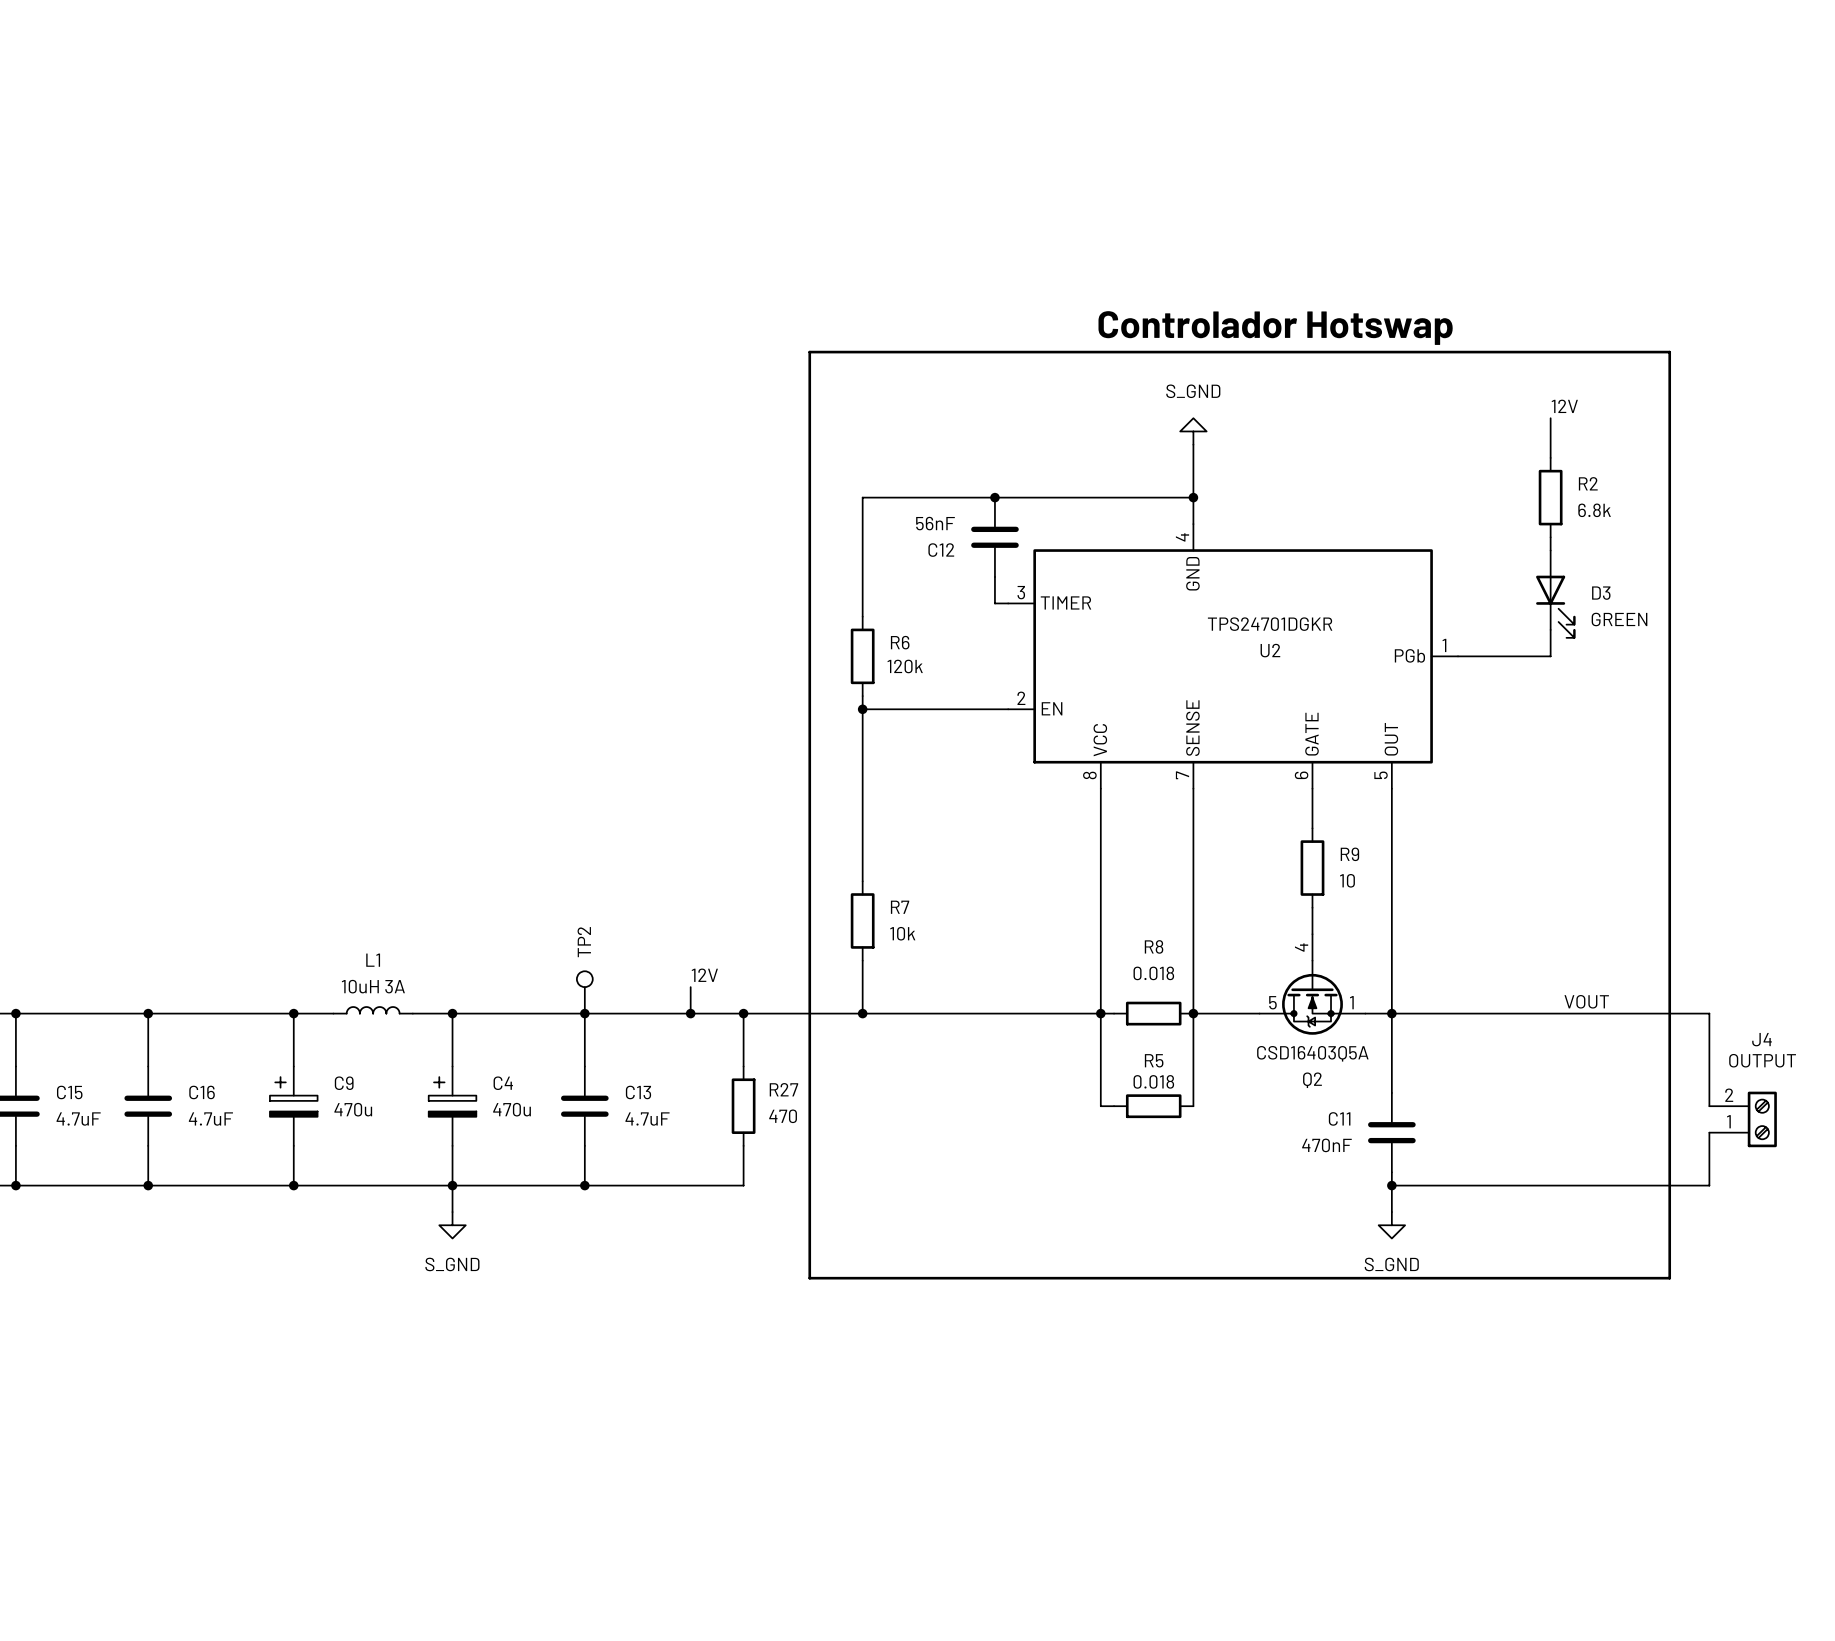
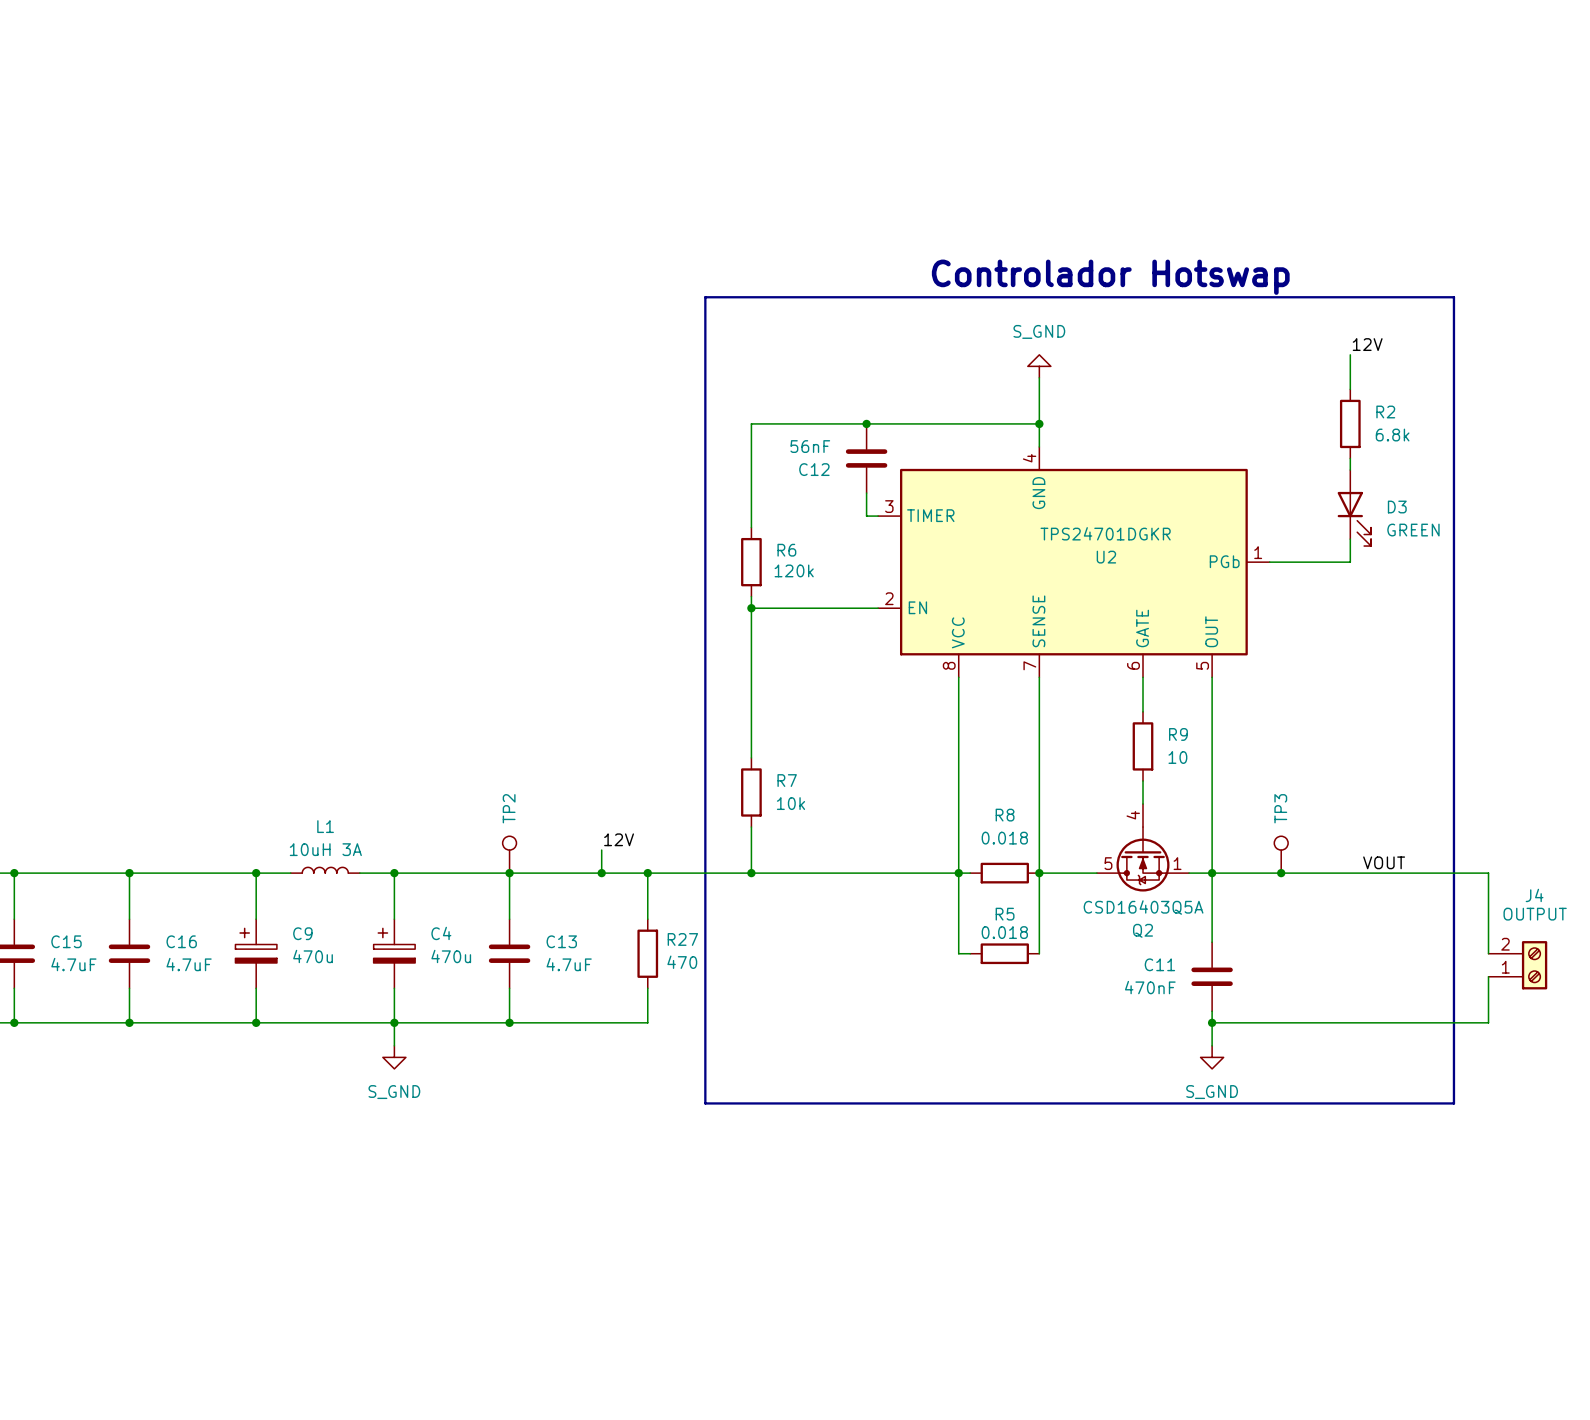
TP3: none -> (1281, 854)
junction: none -> (1281, 873)

